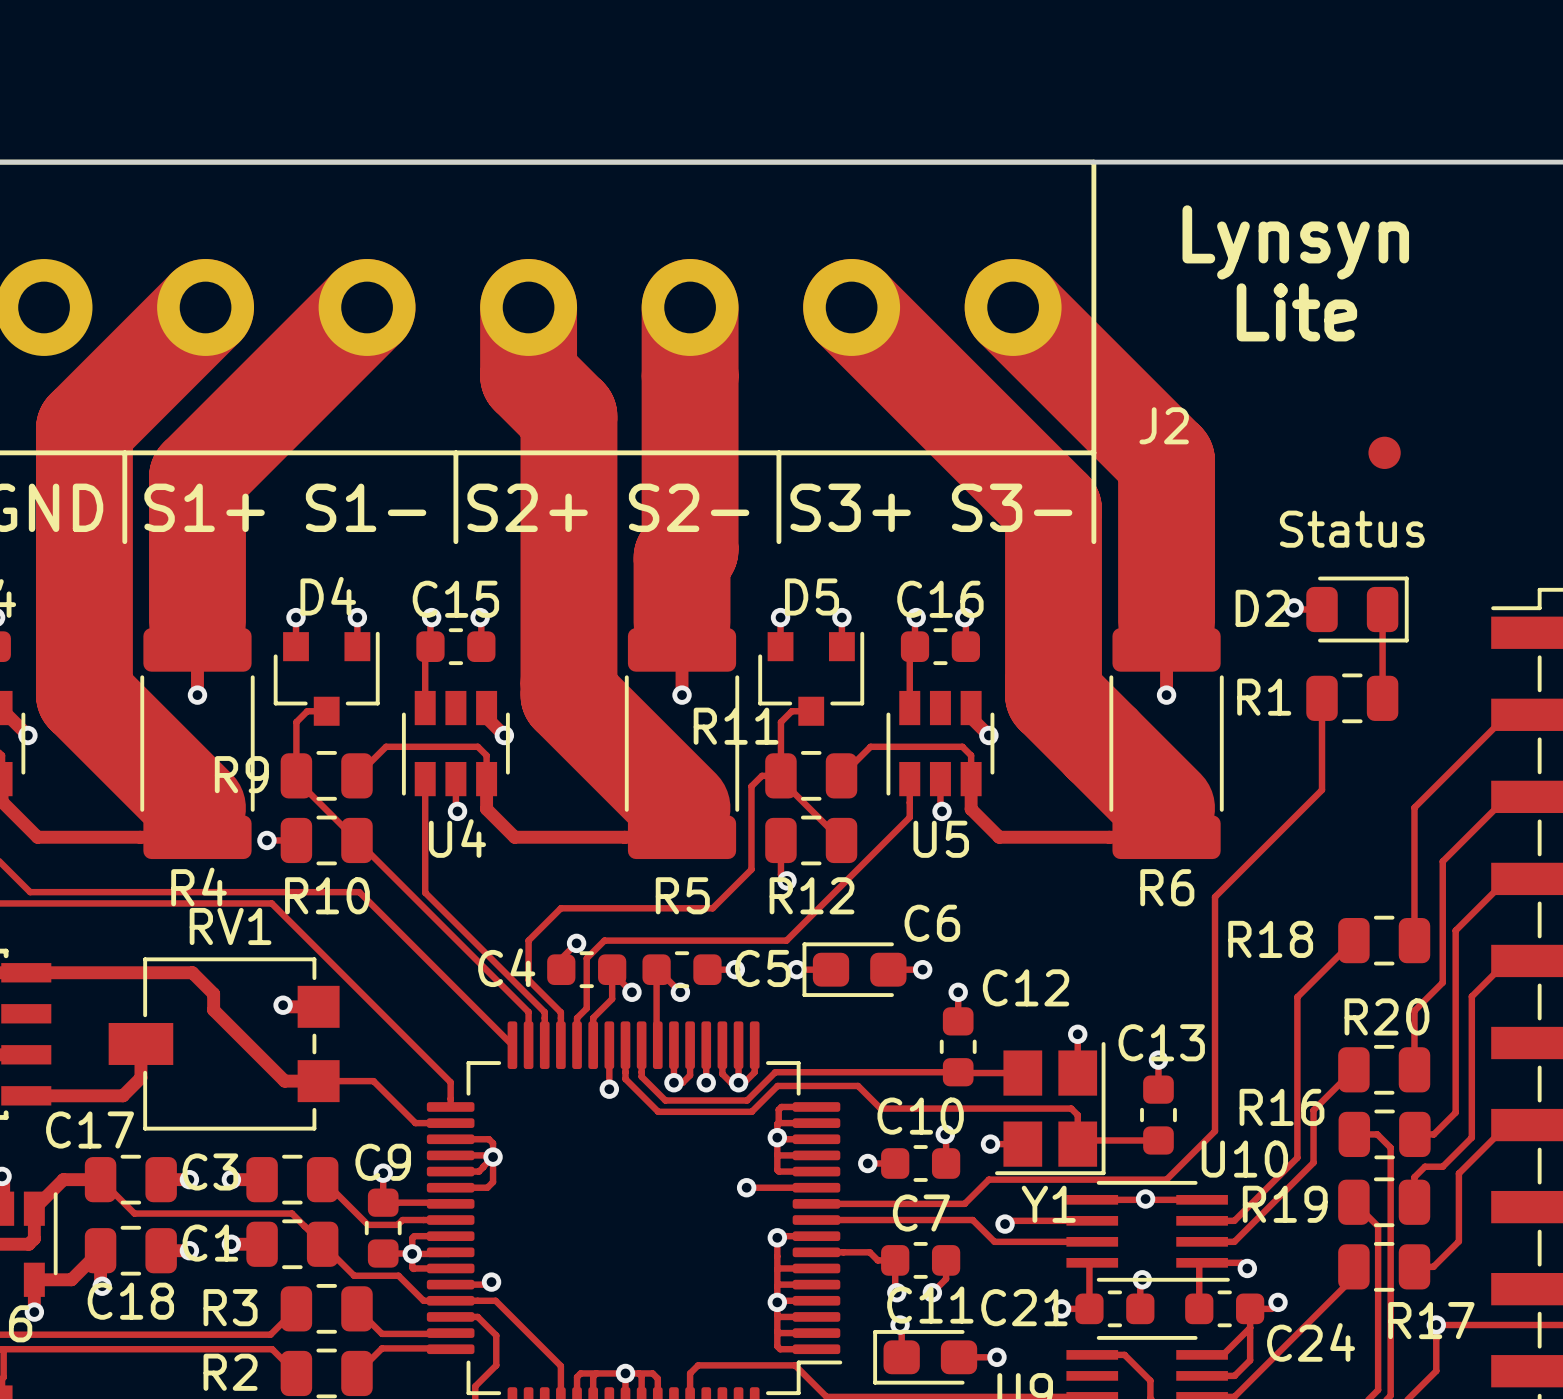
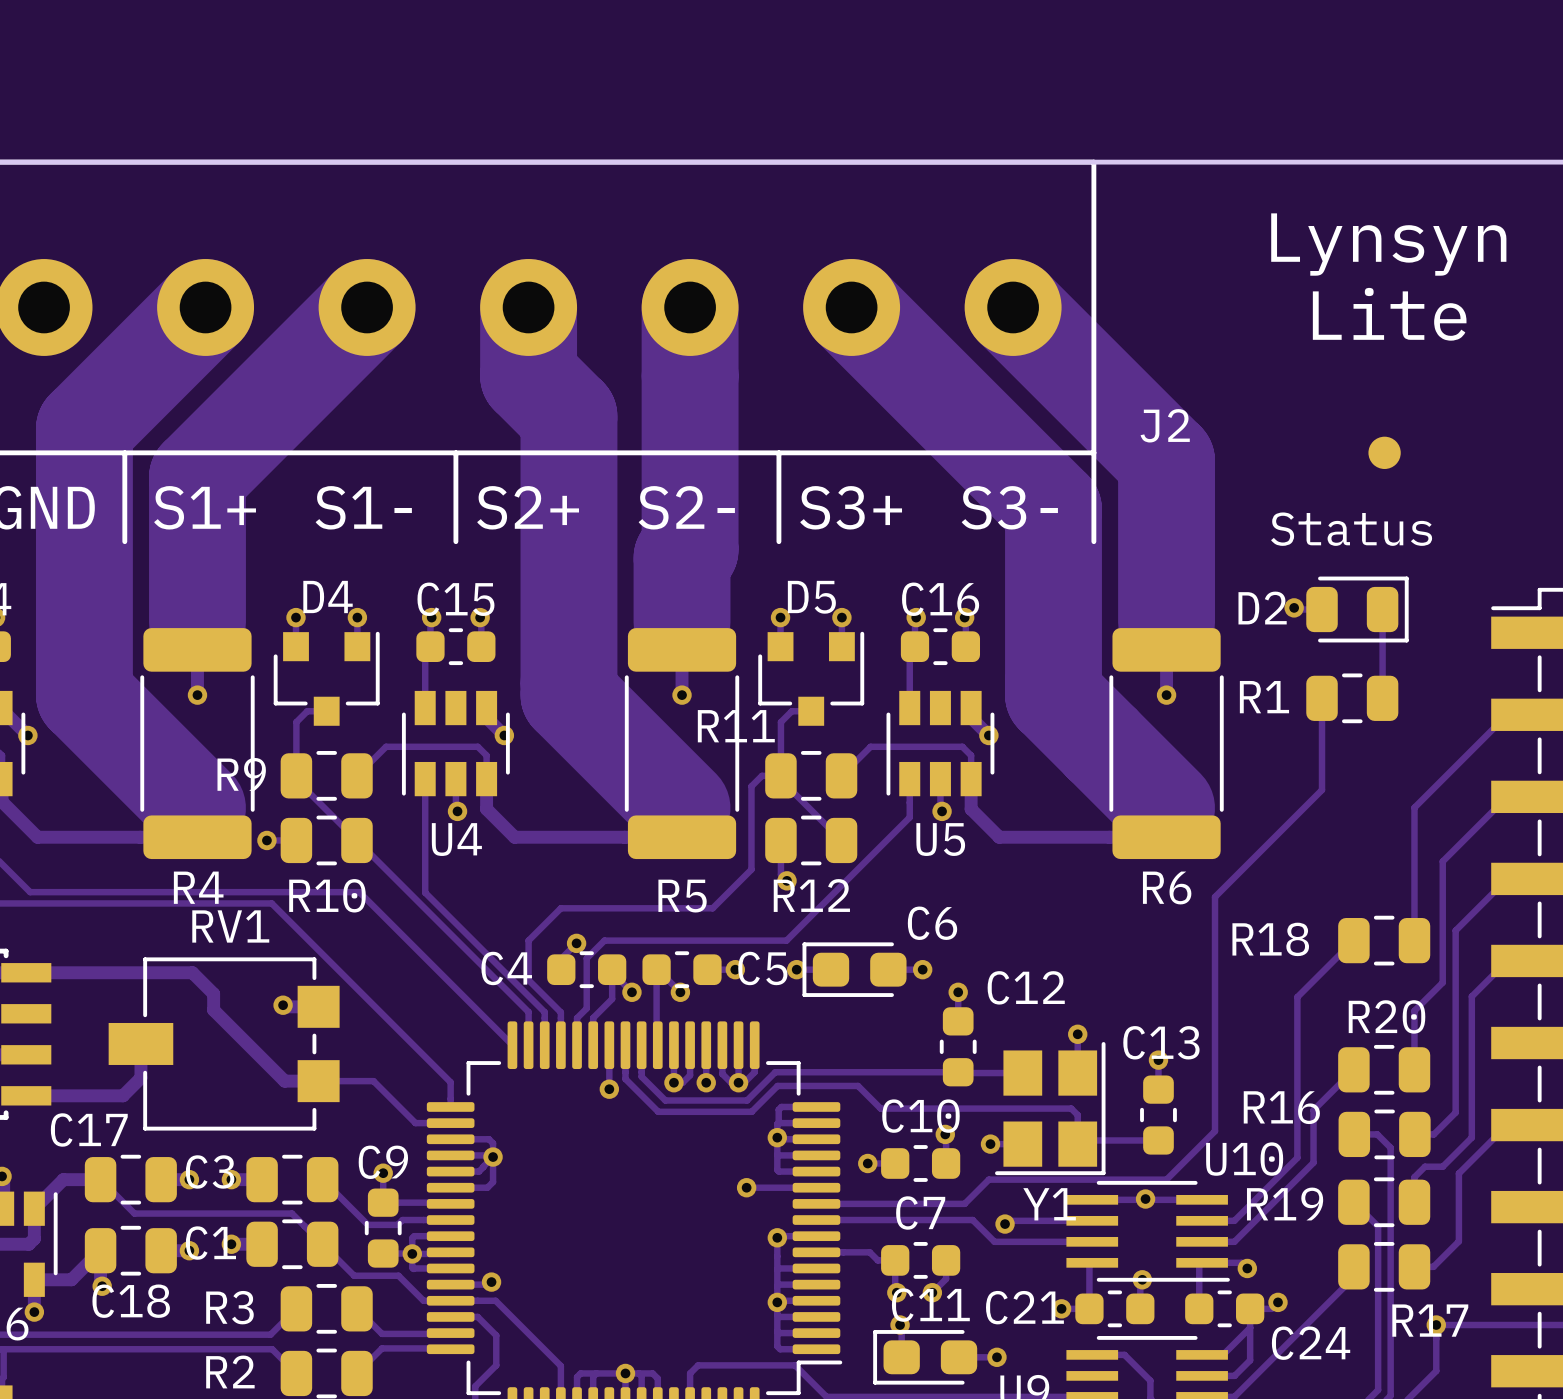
text position: Lynsyn (1295, 242) -> Lynsyn (1388, 244)
text position: Lite (1296, 312) -> Lite (1389, 314)

